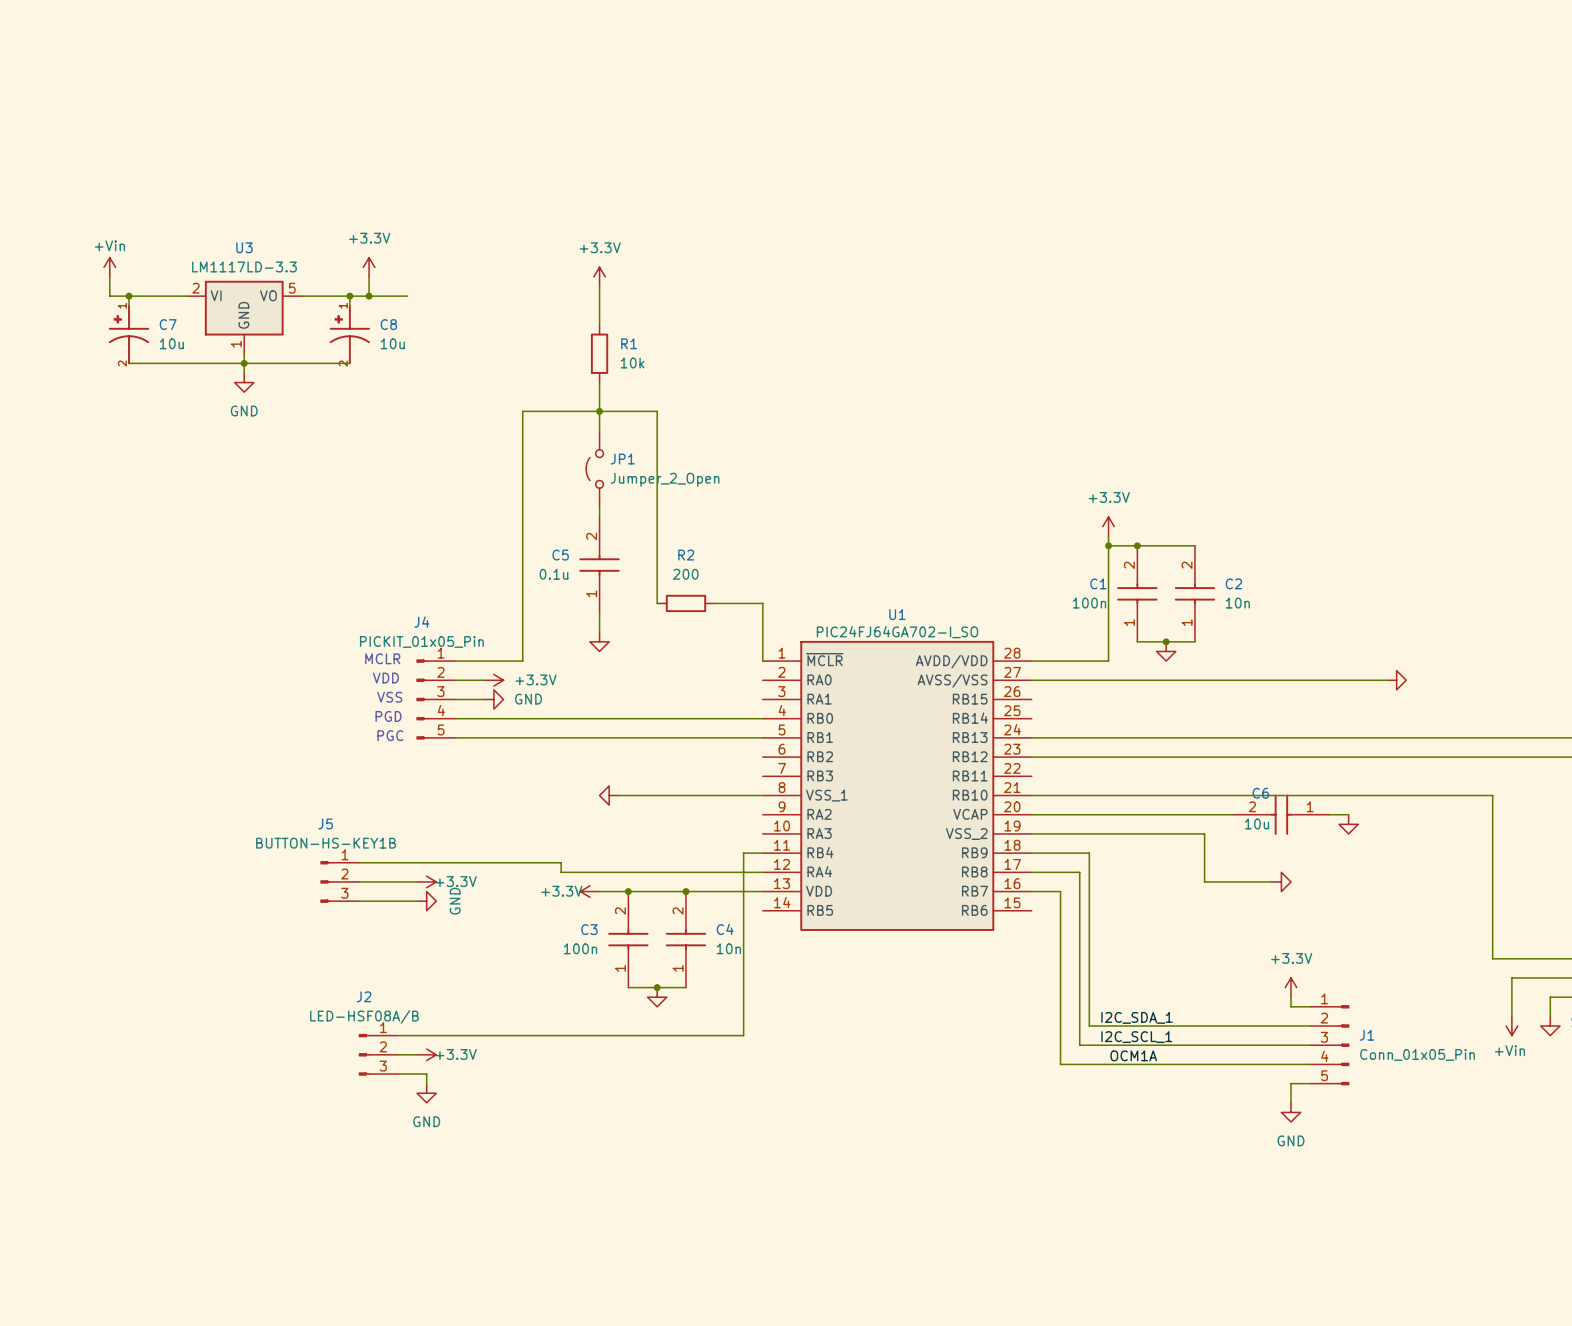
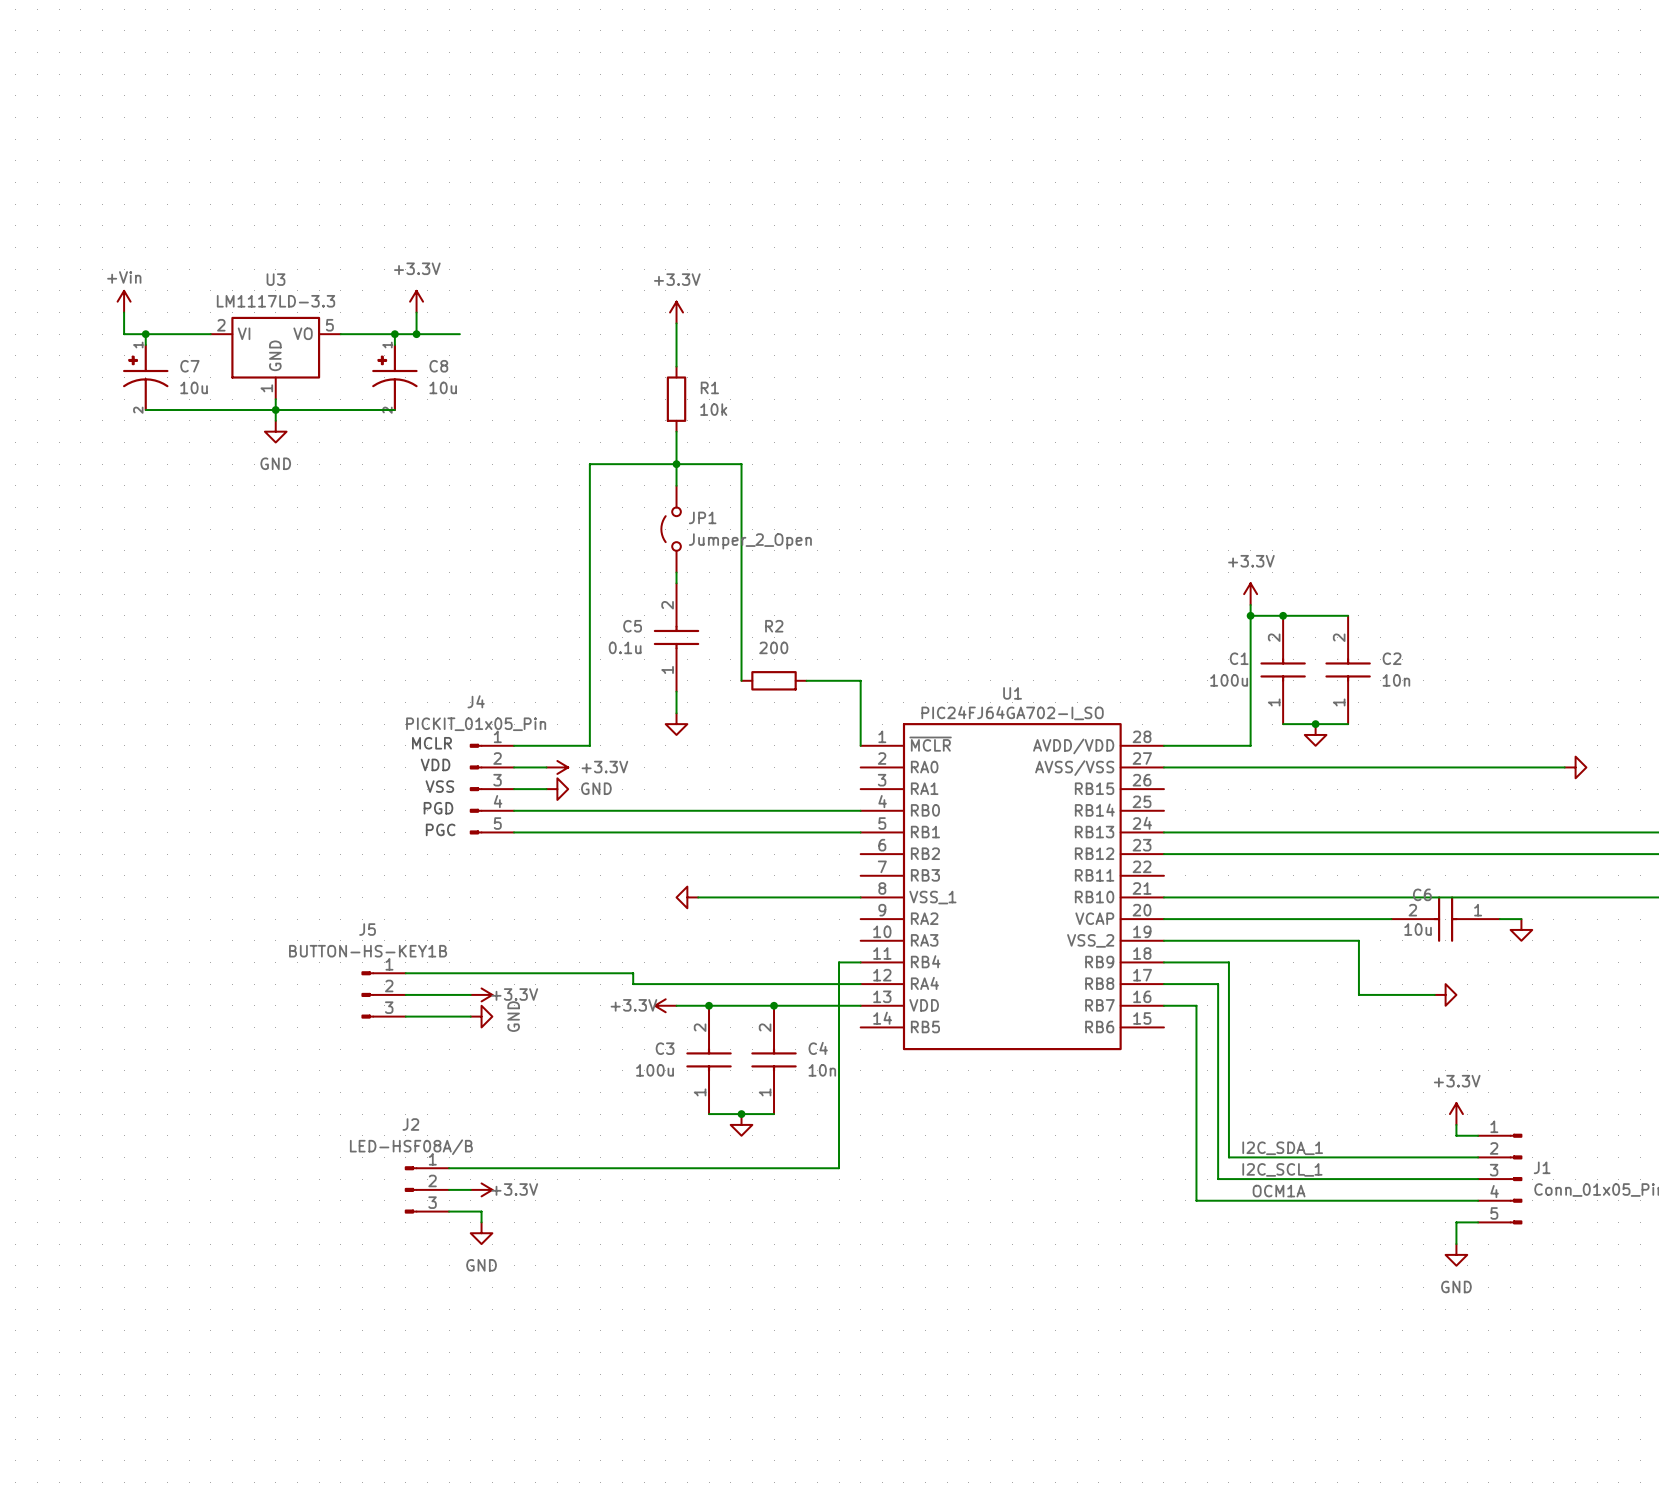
C1 value: 100n (1089, 603) -> 100u (1229, 680)
C3 value: 100n (580, 948) -> 100u (655, 1070)

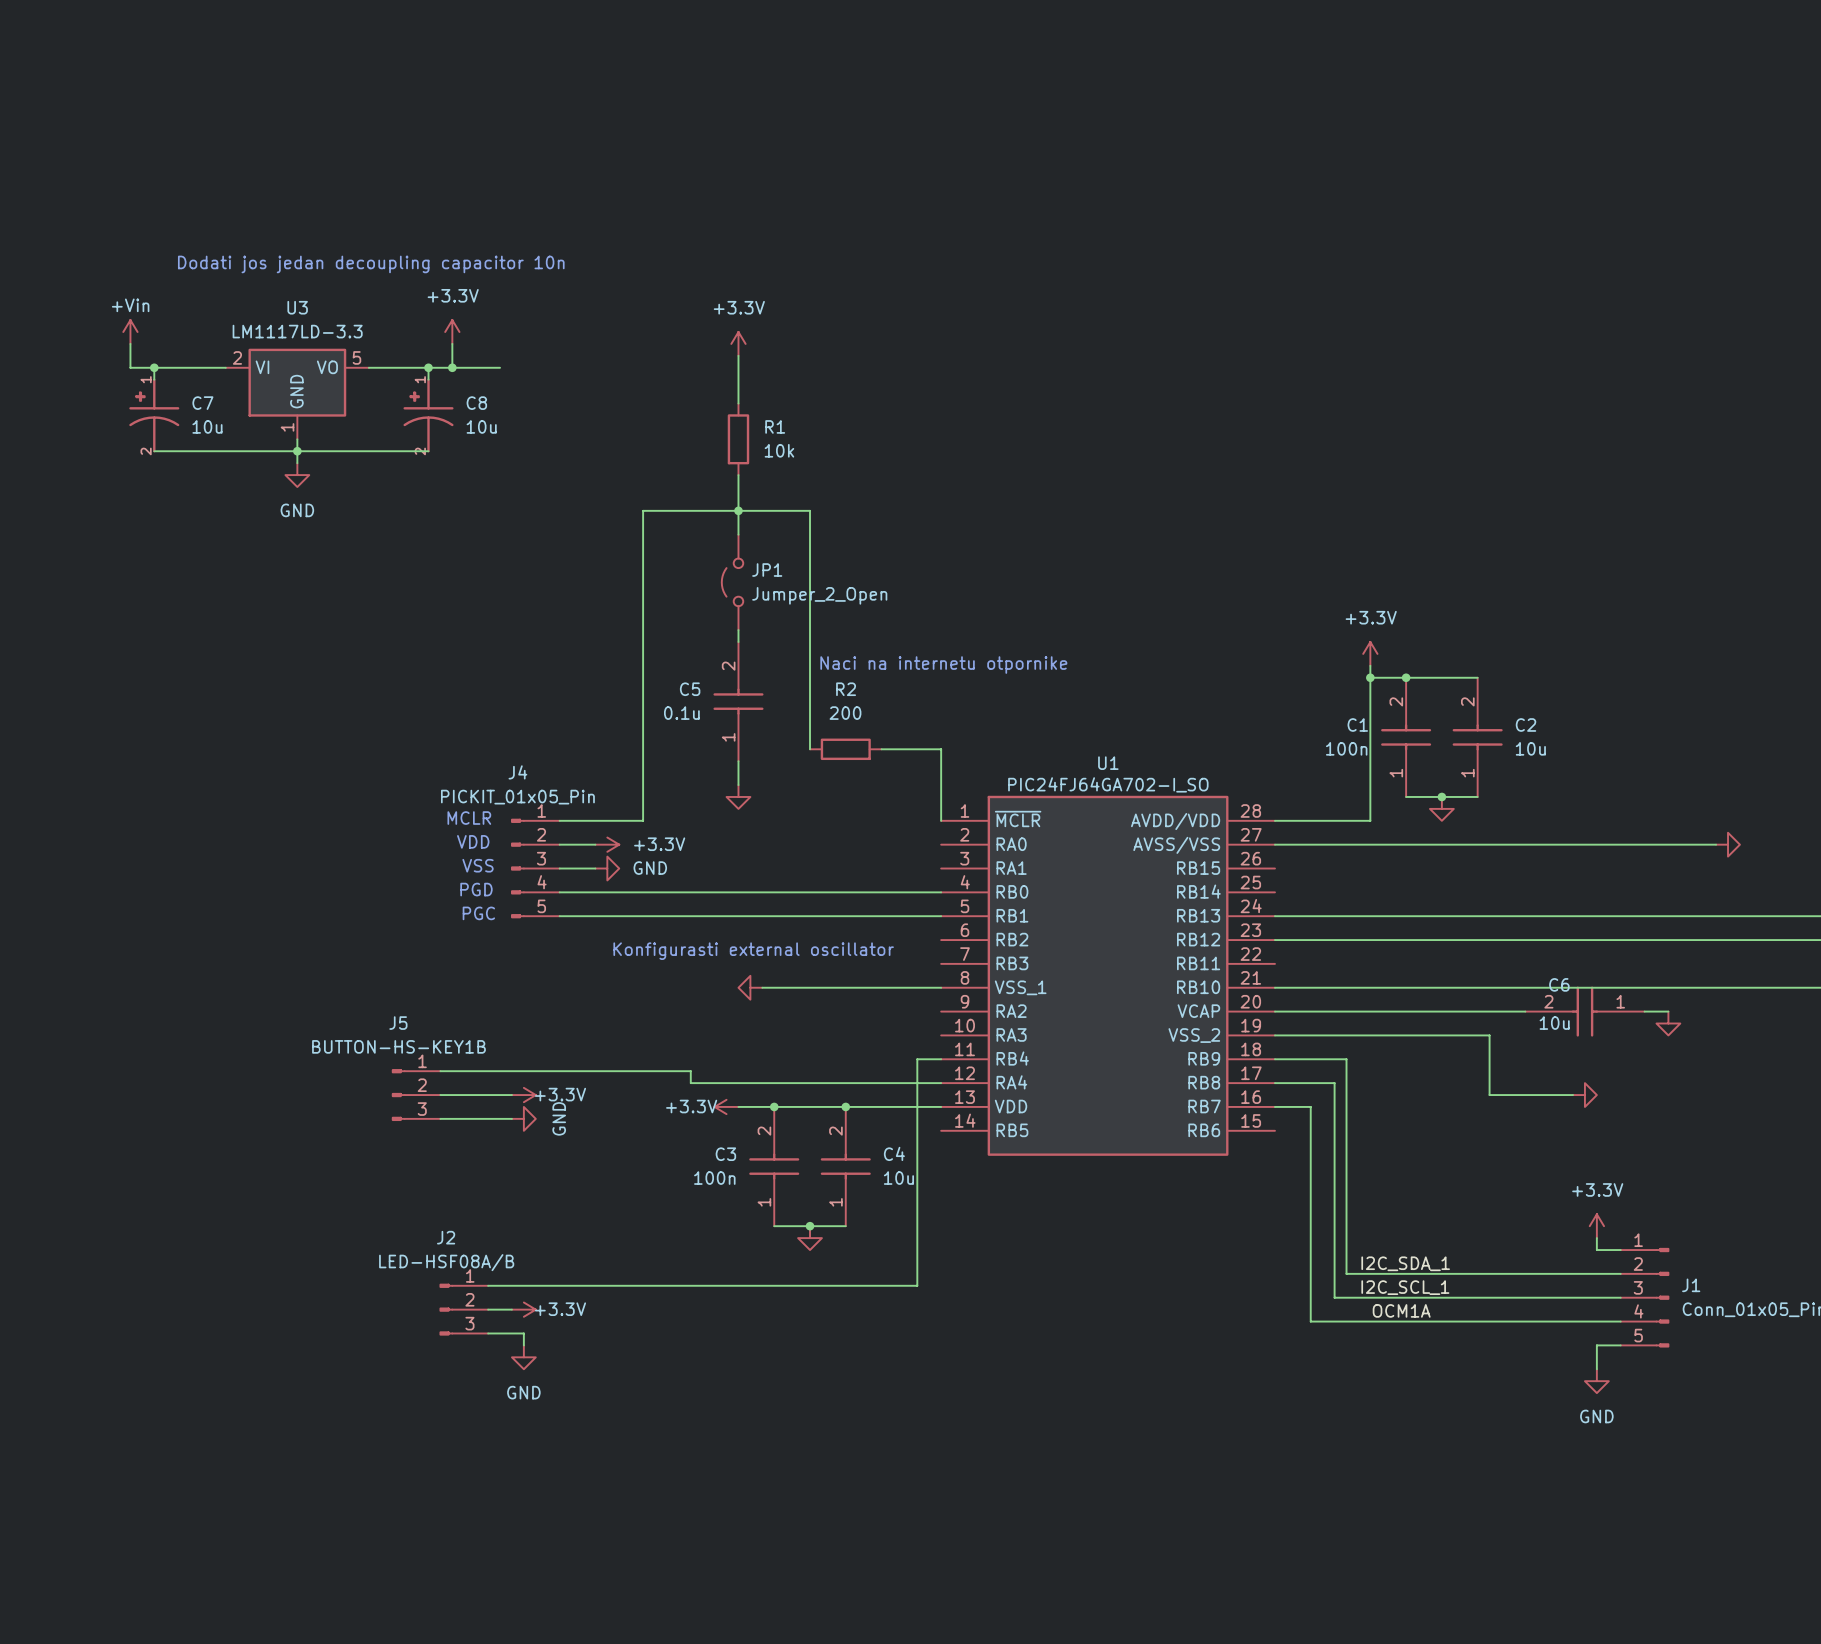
text: none -> Dodati jos jedan decoupling capacitor 10n (371, 264)
text: none -> Naci na internetu otpornike (943, 665)
C1 value: 100u (1229, 680) -> 100n (1346, 748)
C2 value: 10n (1396, 680) -> 10u (1530, 748)
text: none -> Konfigurasti external oscillator (753, 951)
C3 value: 100u (655, 1070) -> 100n (714, 1178)
C4 value: 10n (822, 1070) -> 10u (898, 1178)

